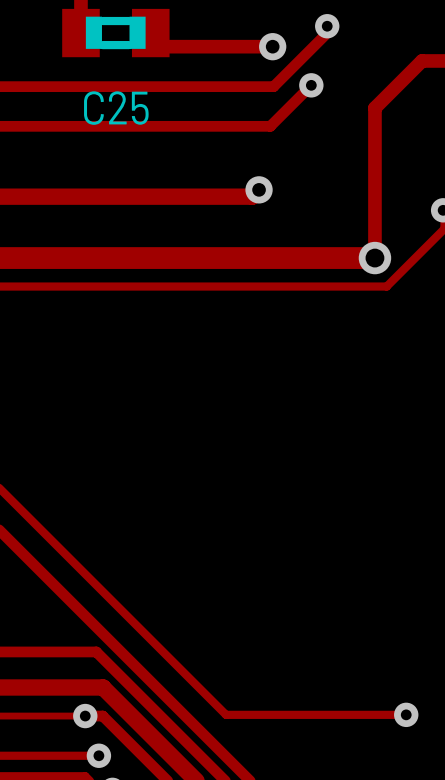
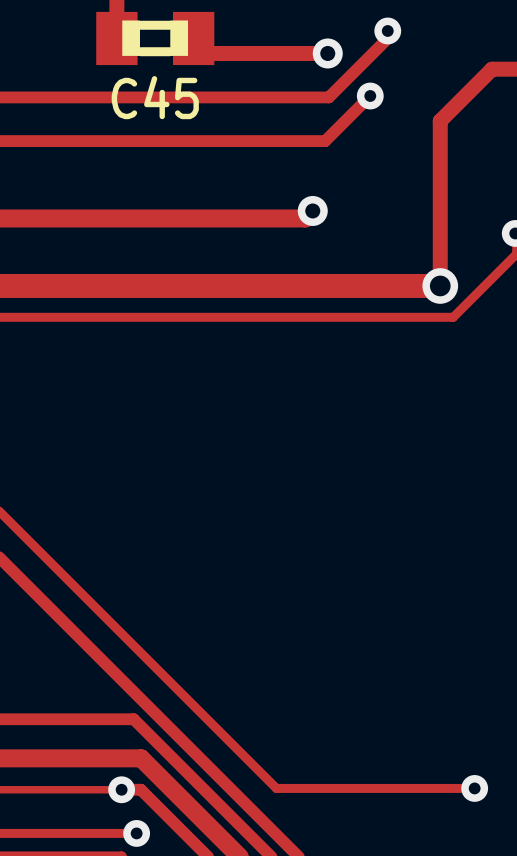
C25 name: C25 (116, 108) -> C45 (155, 97)

